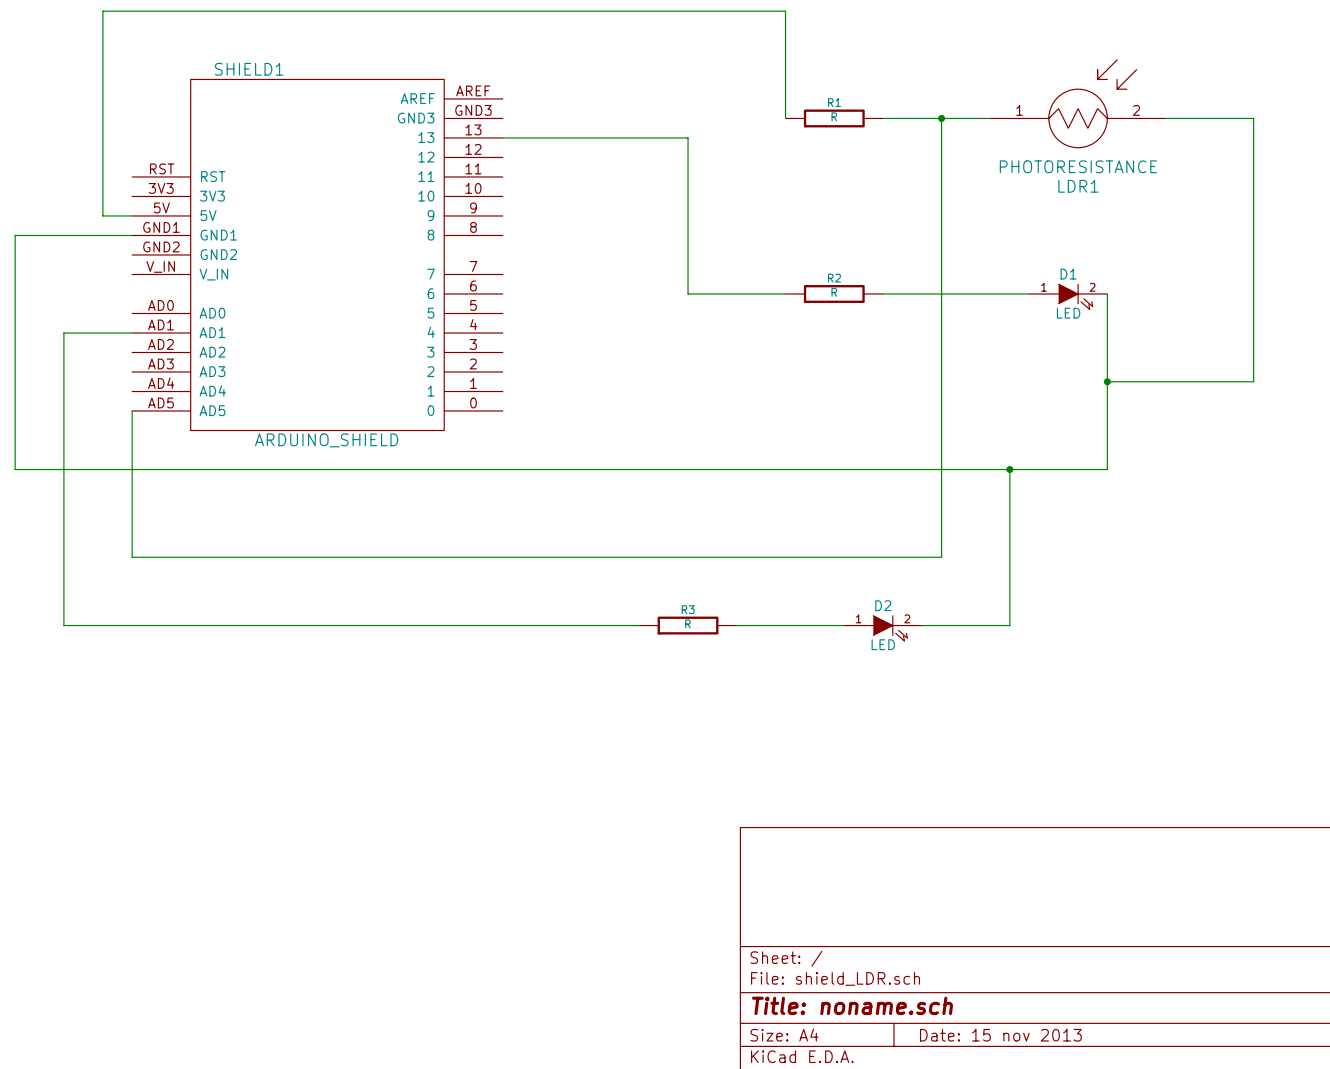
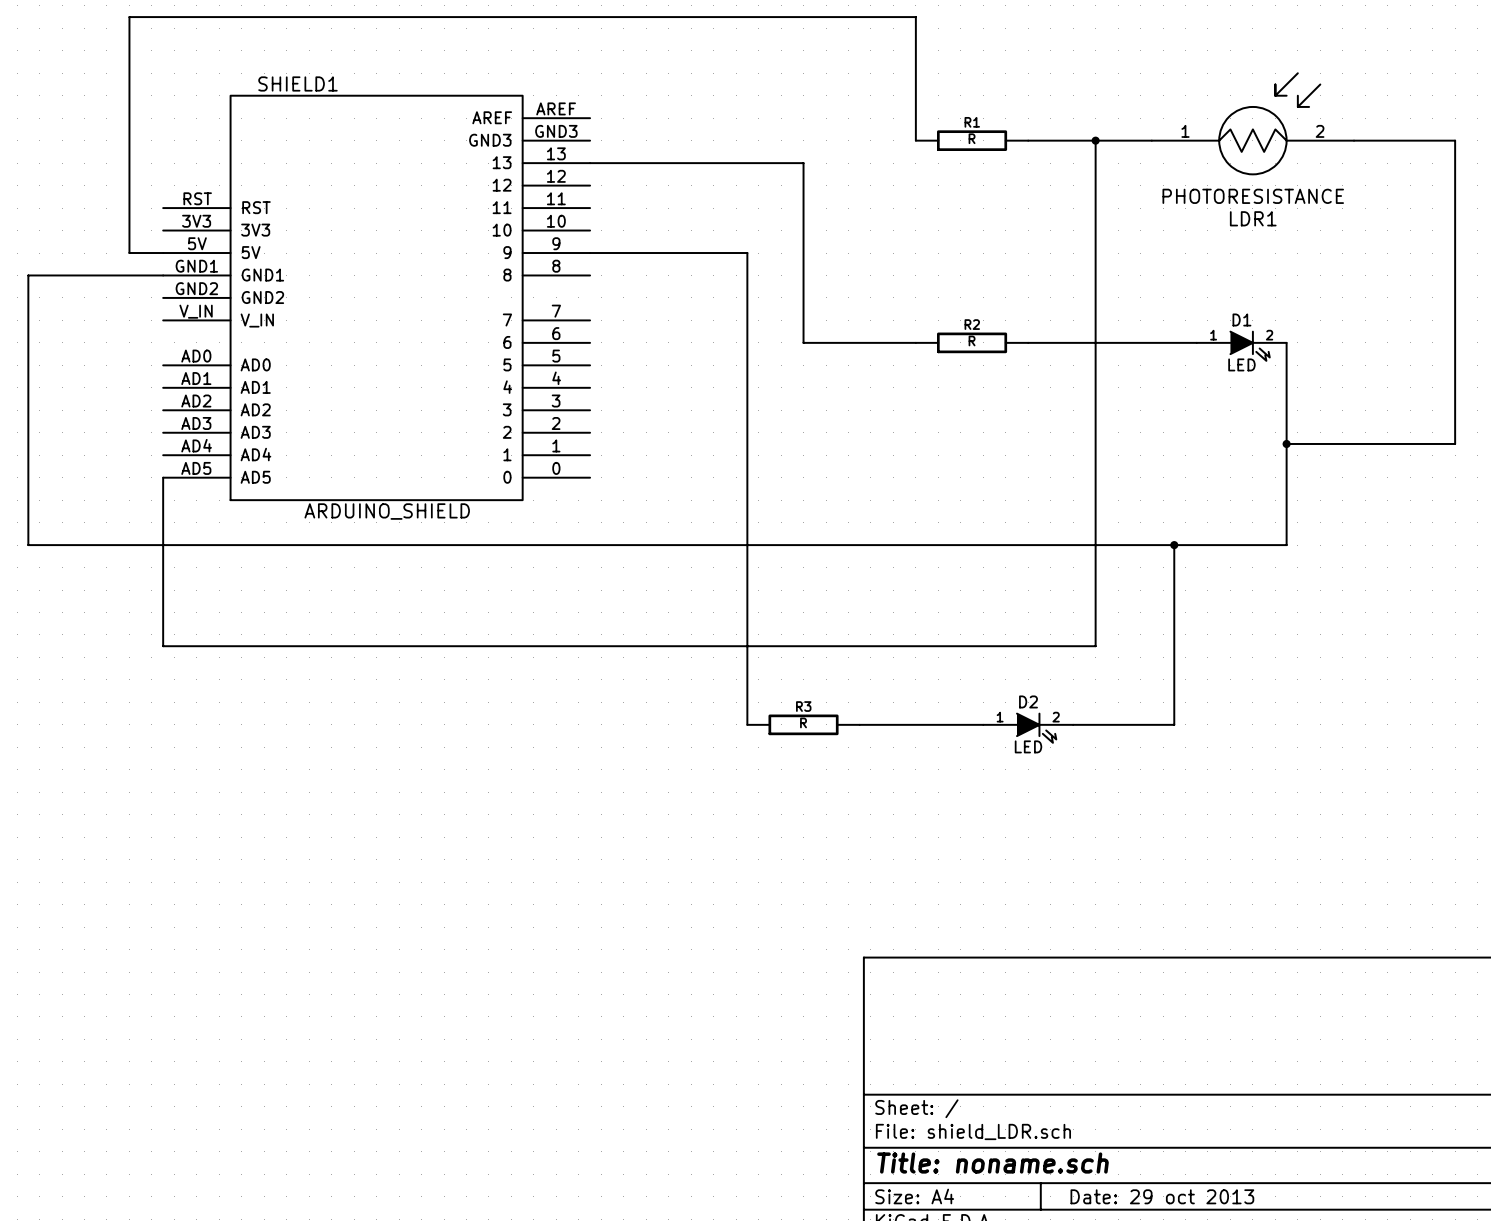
wire: (132, 333) (63, 333) (63, 625) (639, 625) -> (590, 253) (747, 253) (747, 724)
title block: Date: 15 nov 2013 (1000, 1035) -> Date: 29 oct 2013 (1162, 1196)

